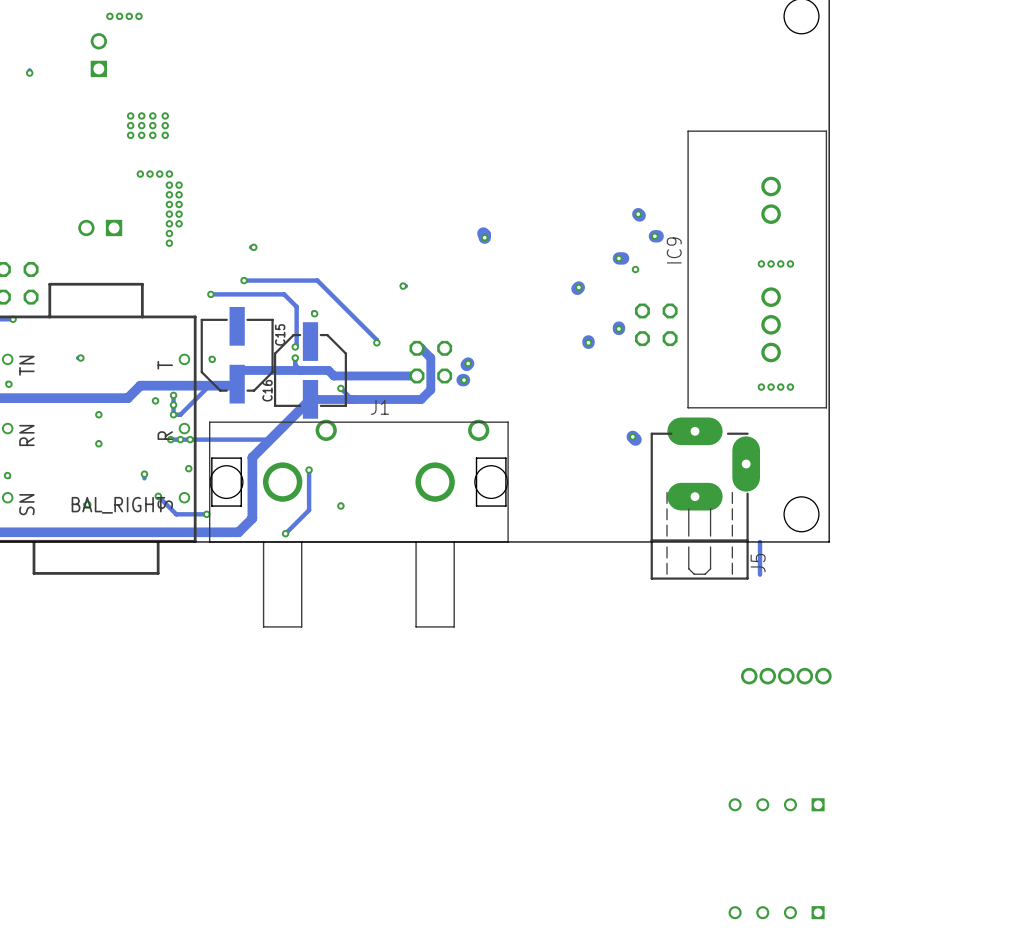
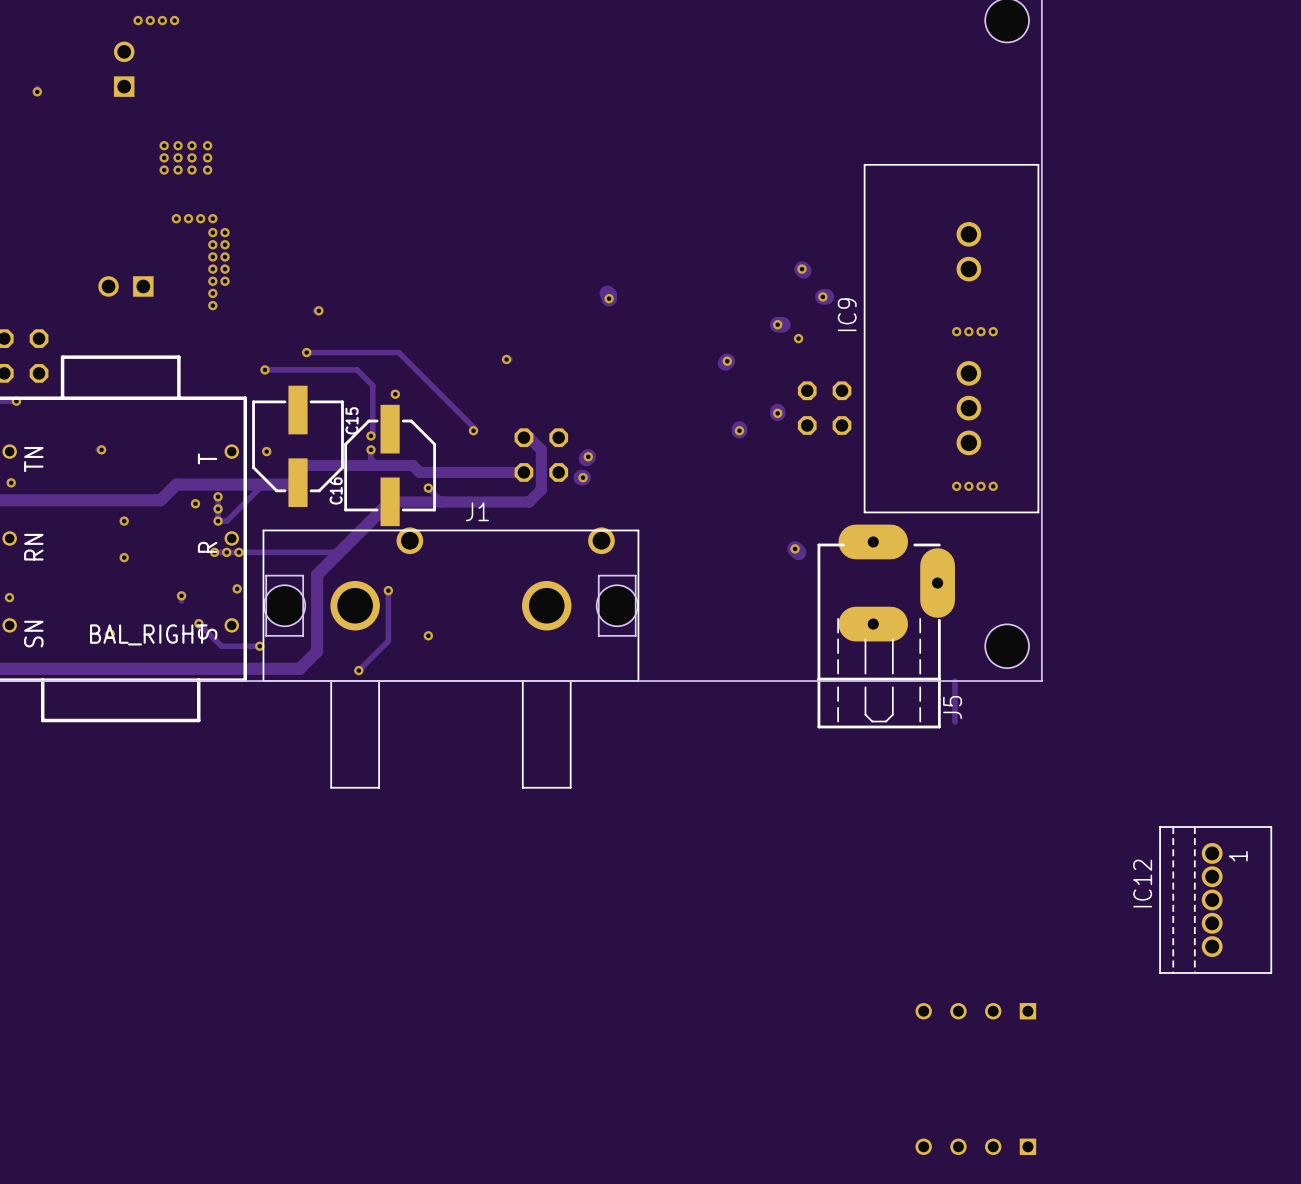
IC12 side: top (786, 676) -> bottom (1215, 900)

